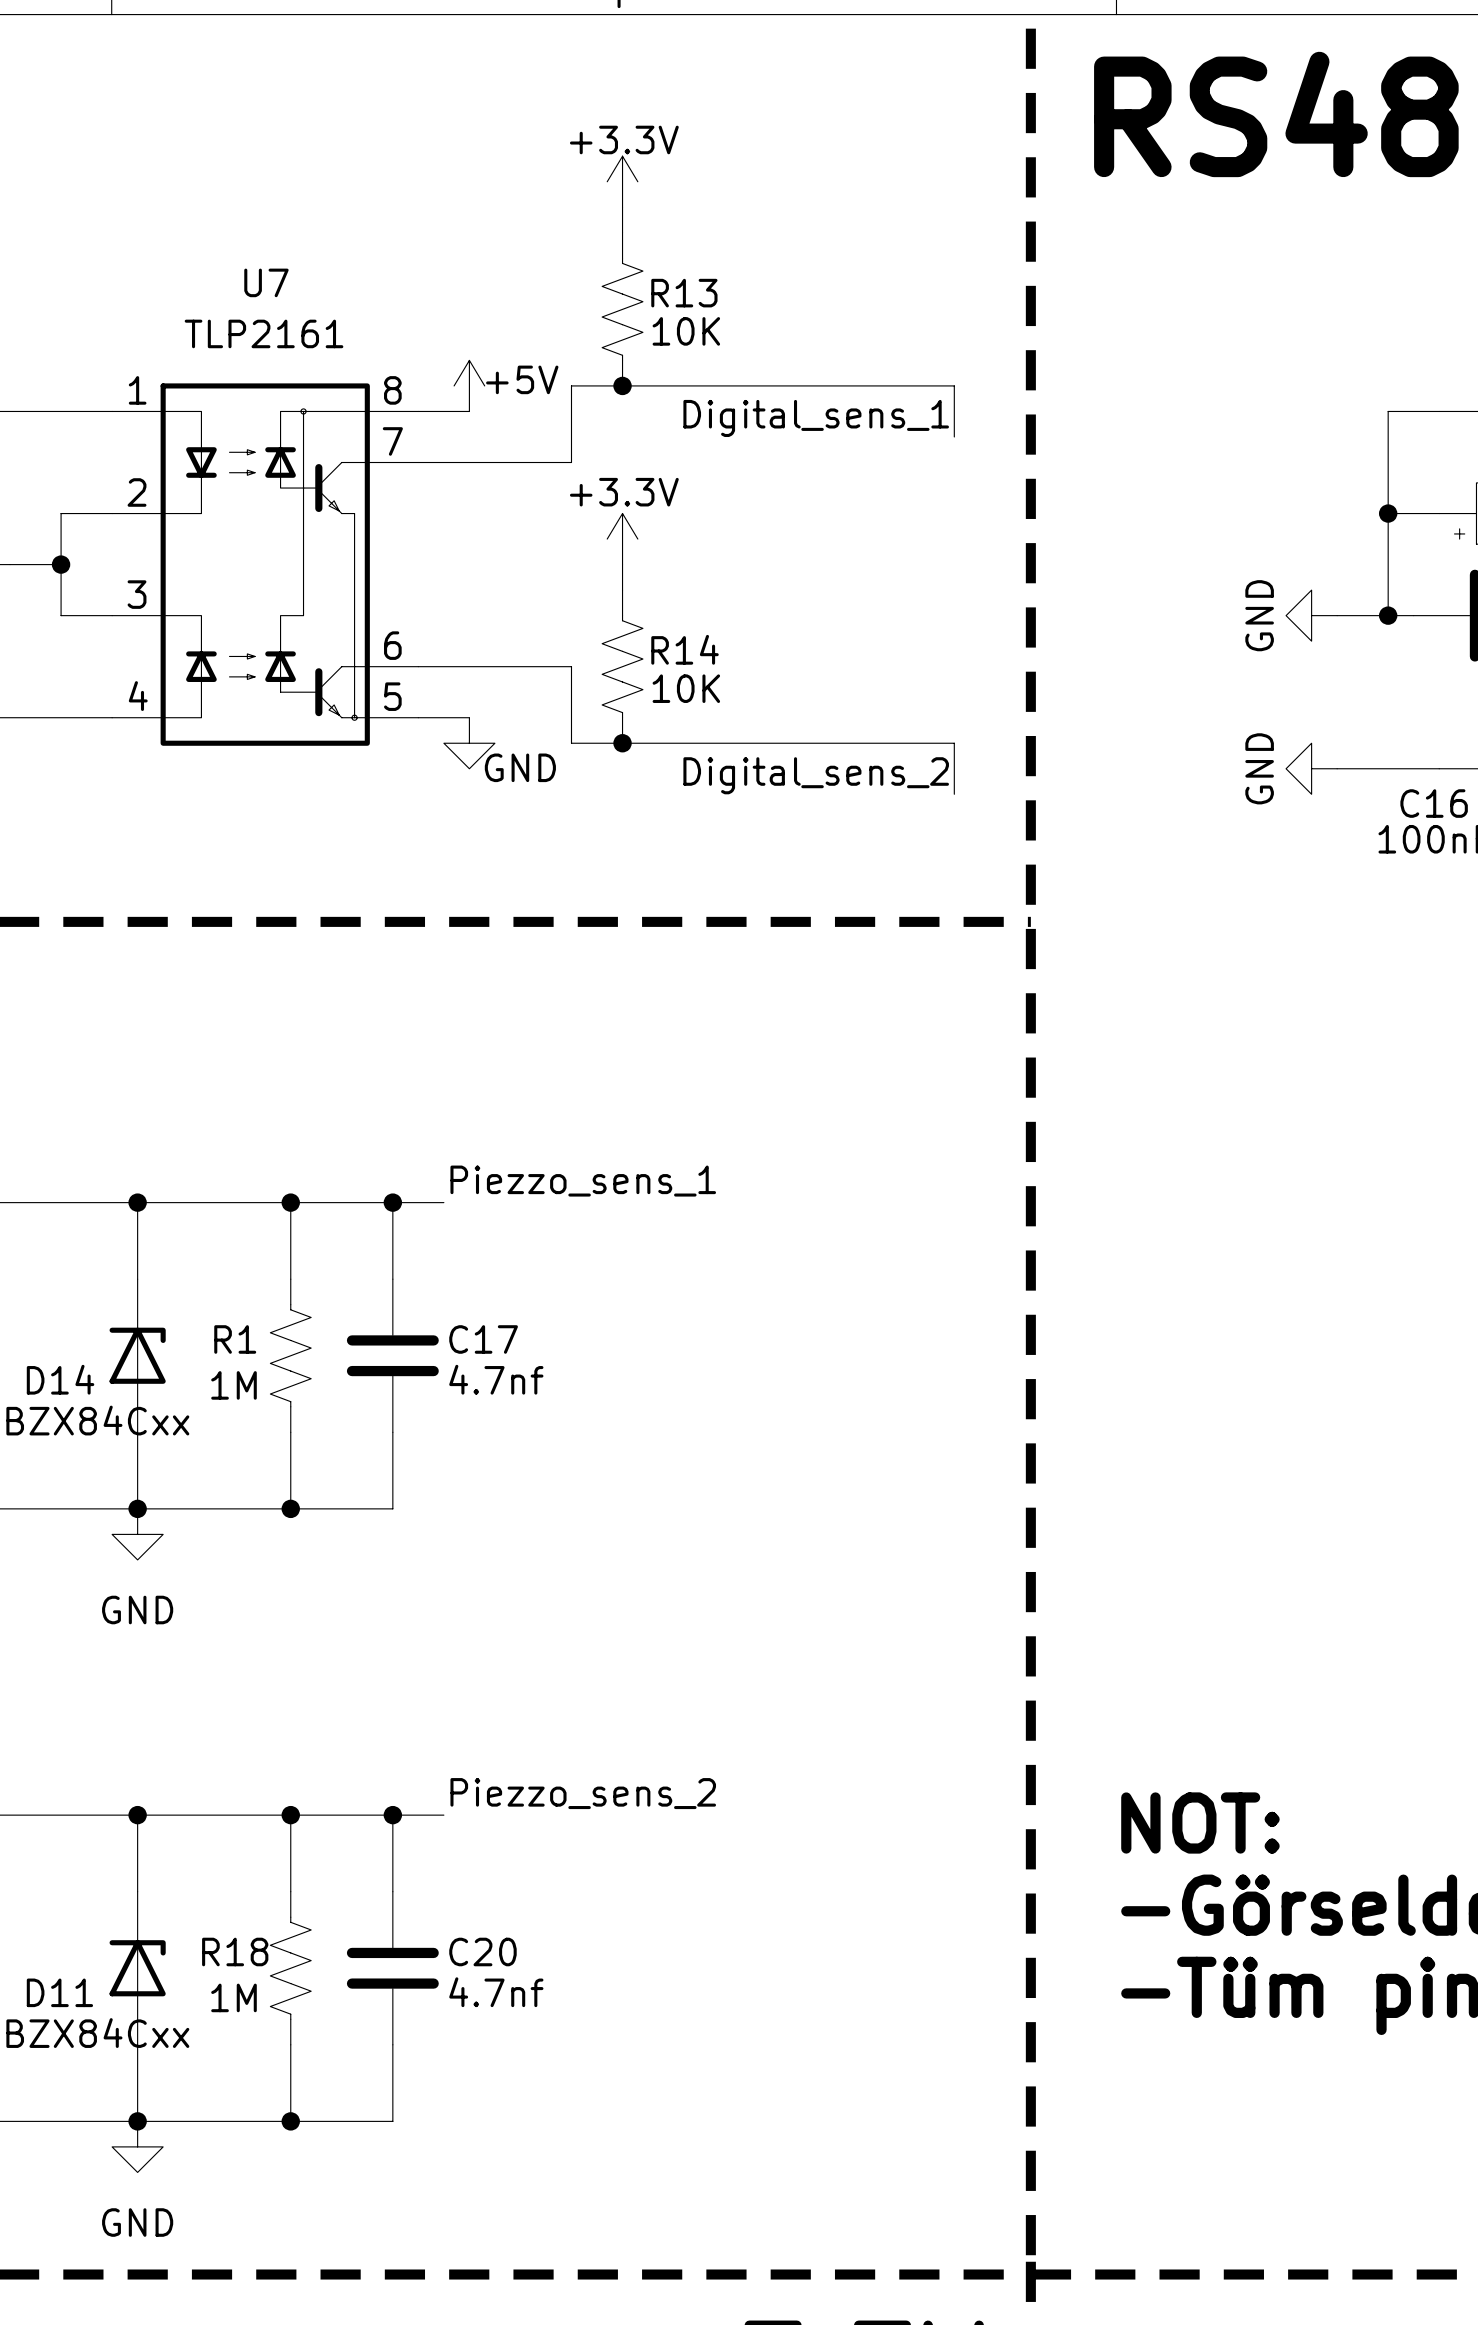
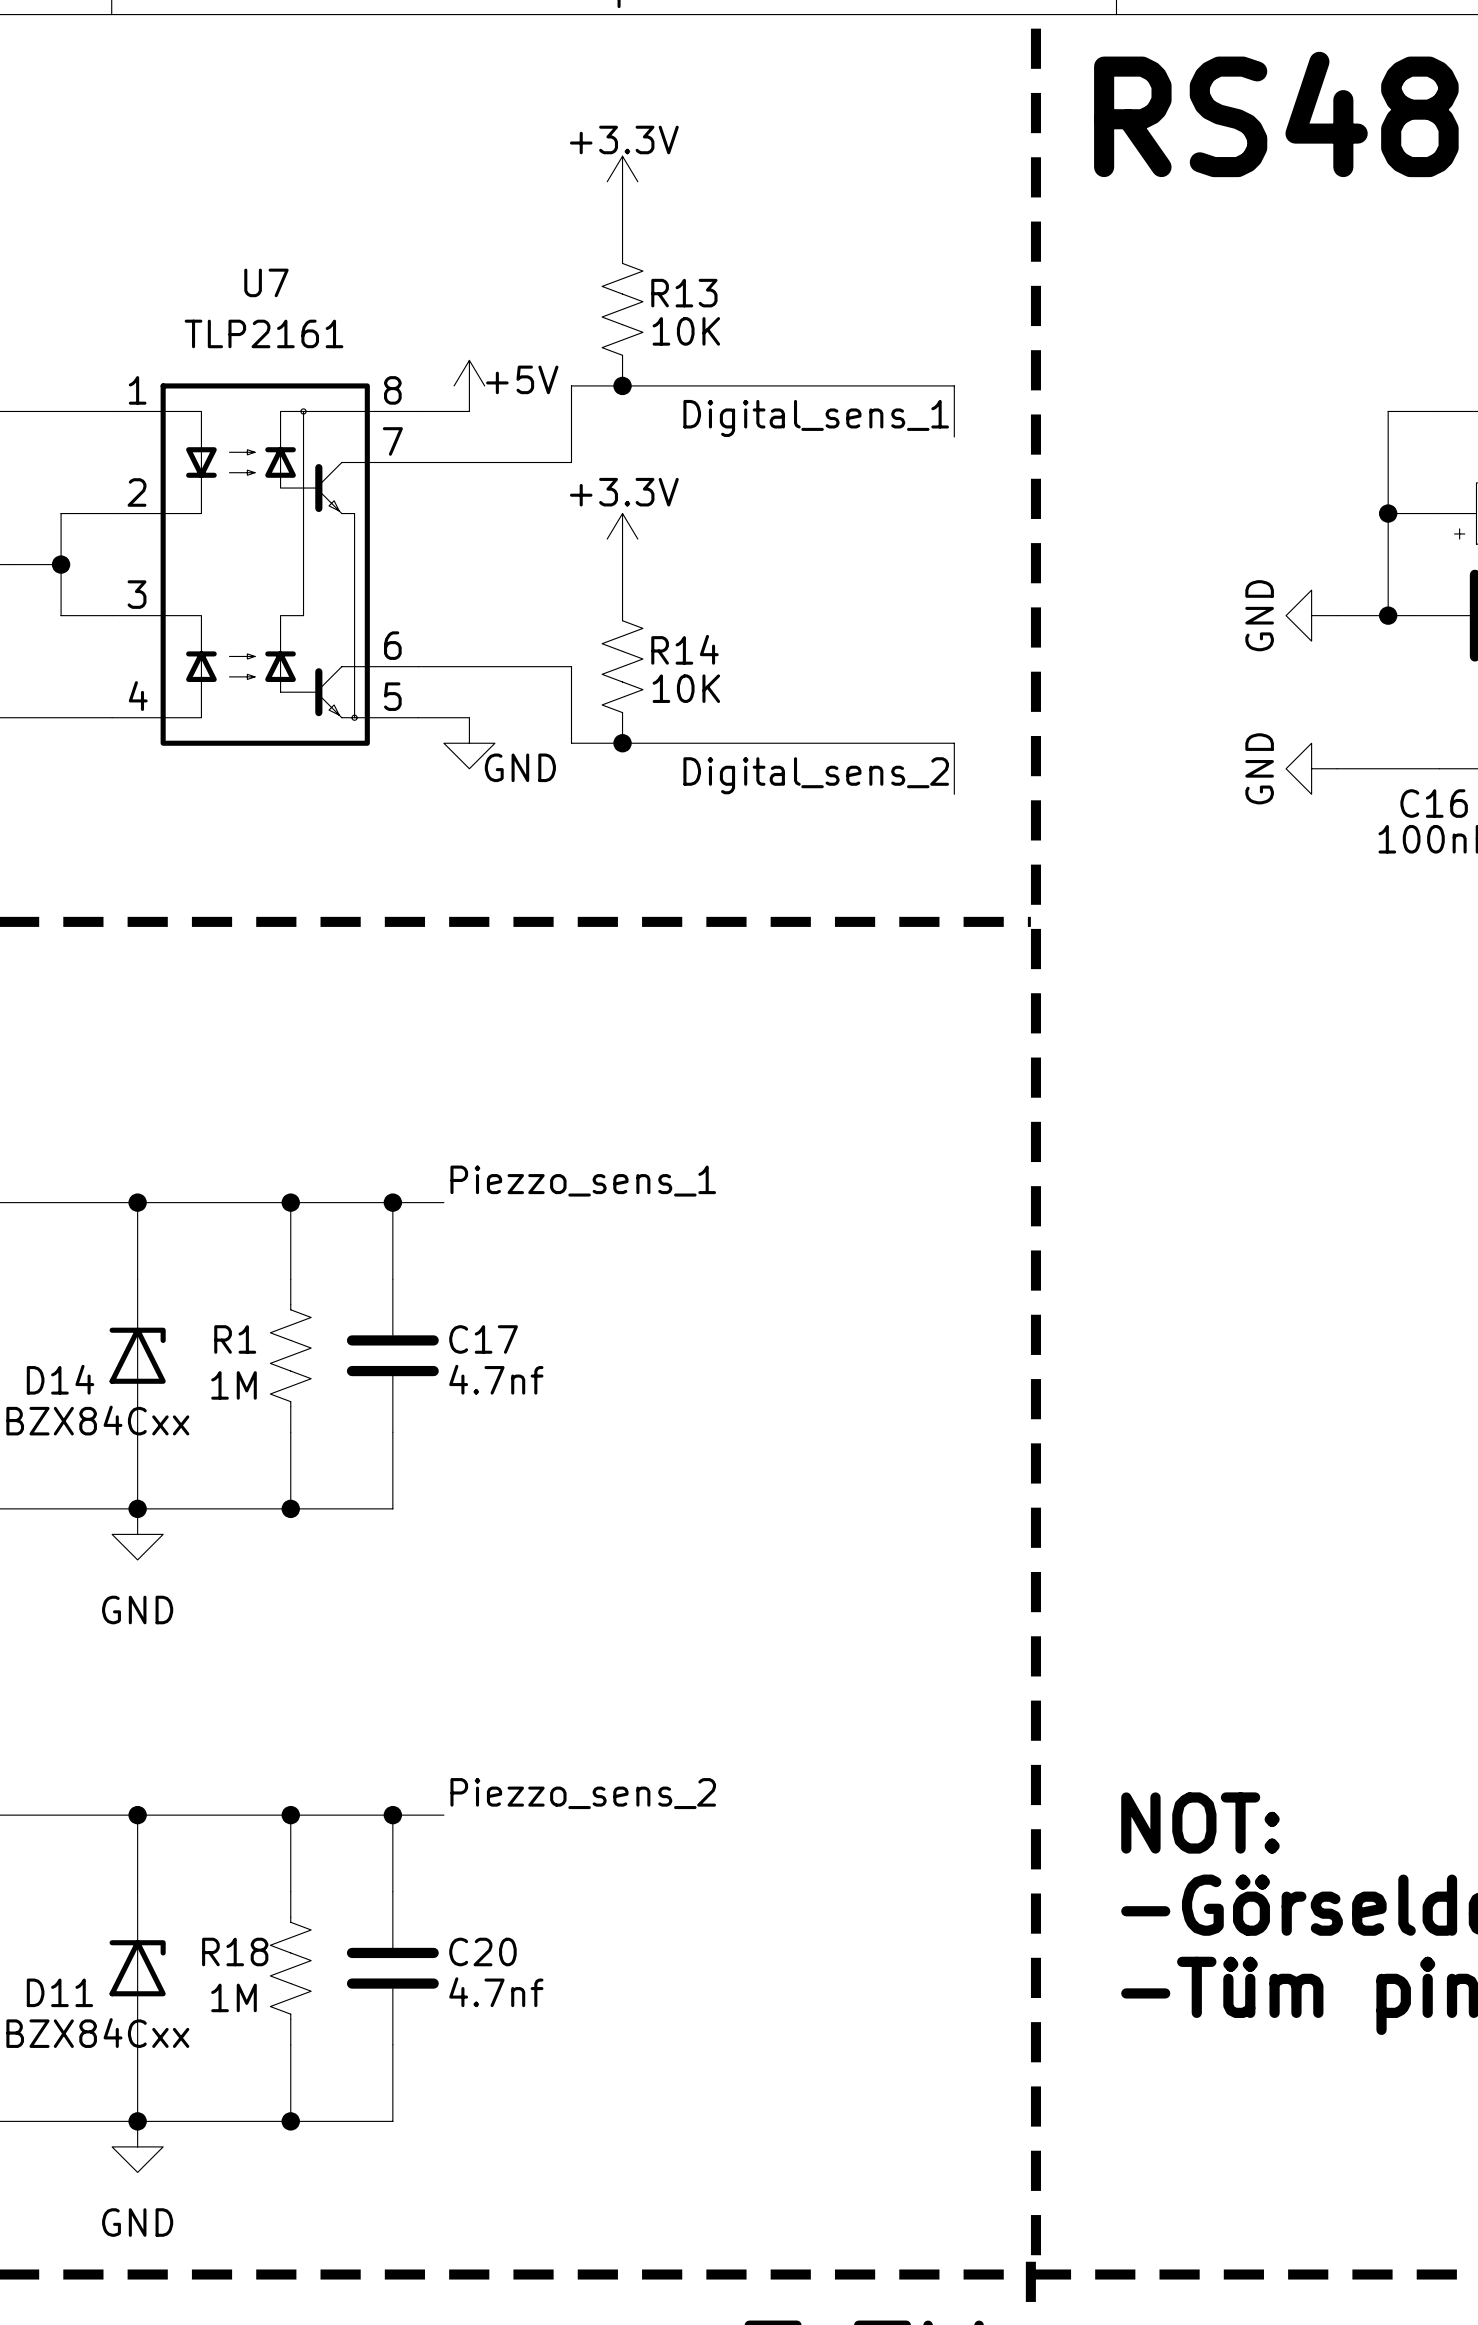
line: (1030, 28) (1030, 2261) -> none
line: none -> (1035, 28) (1035, 2274)

